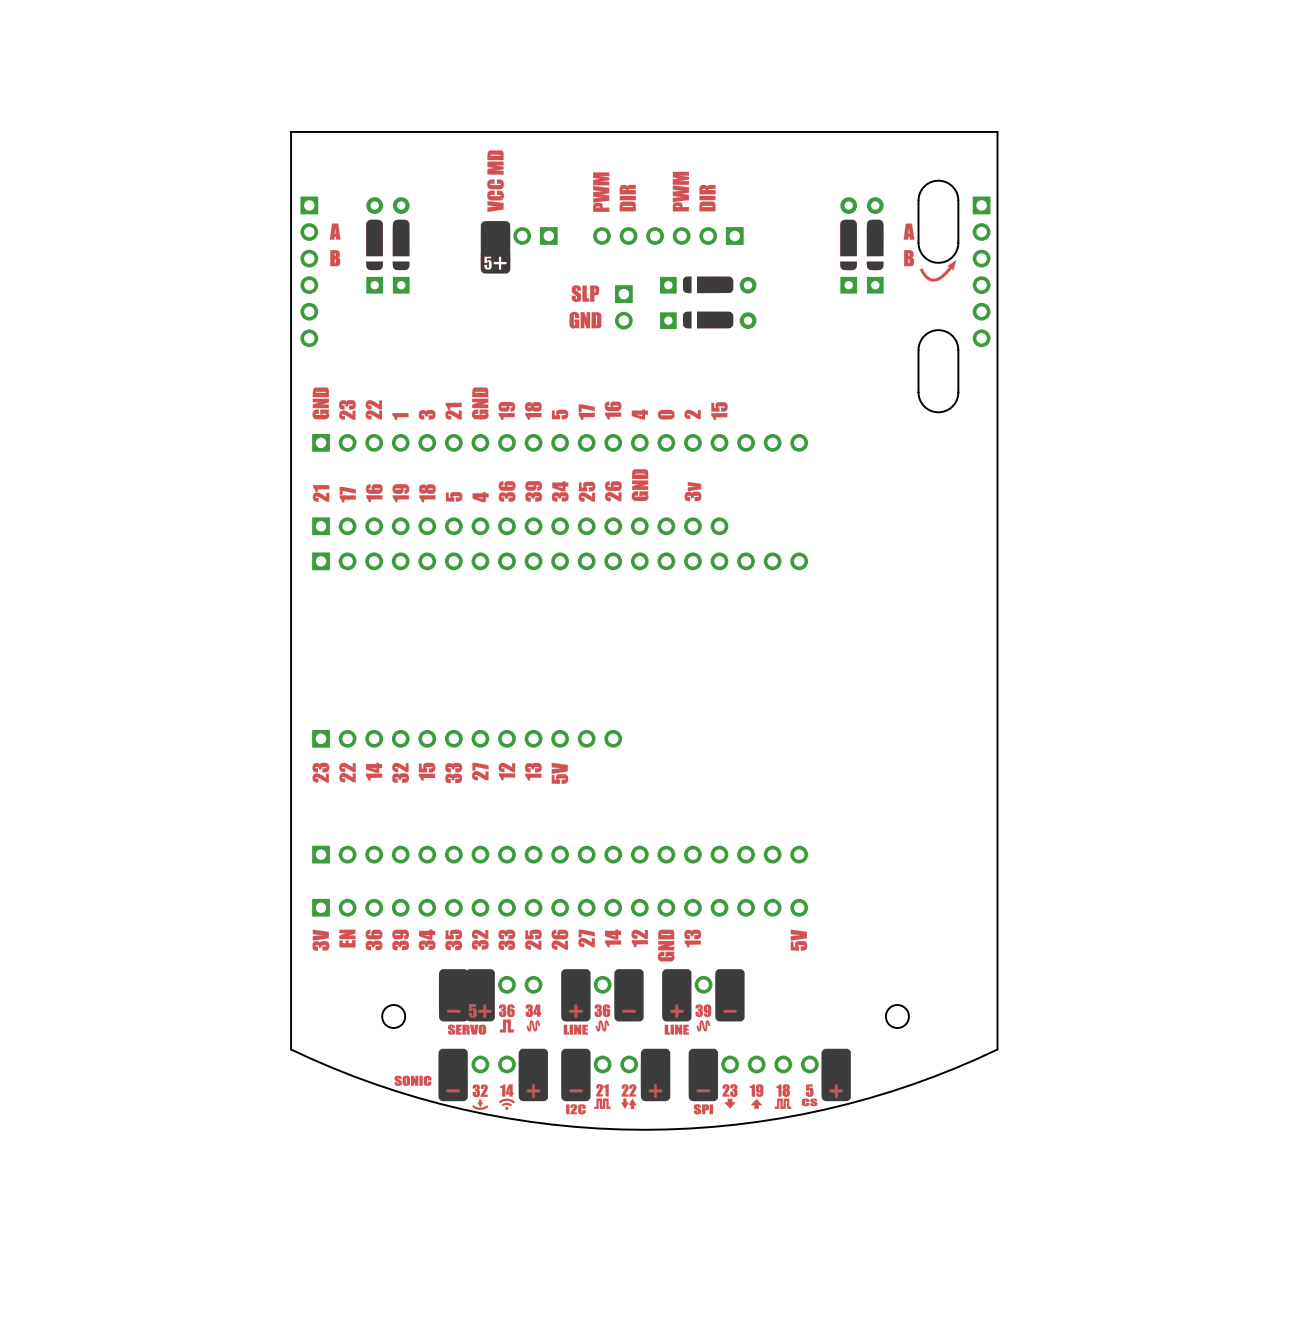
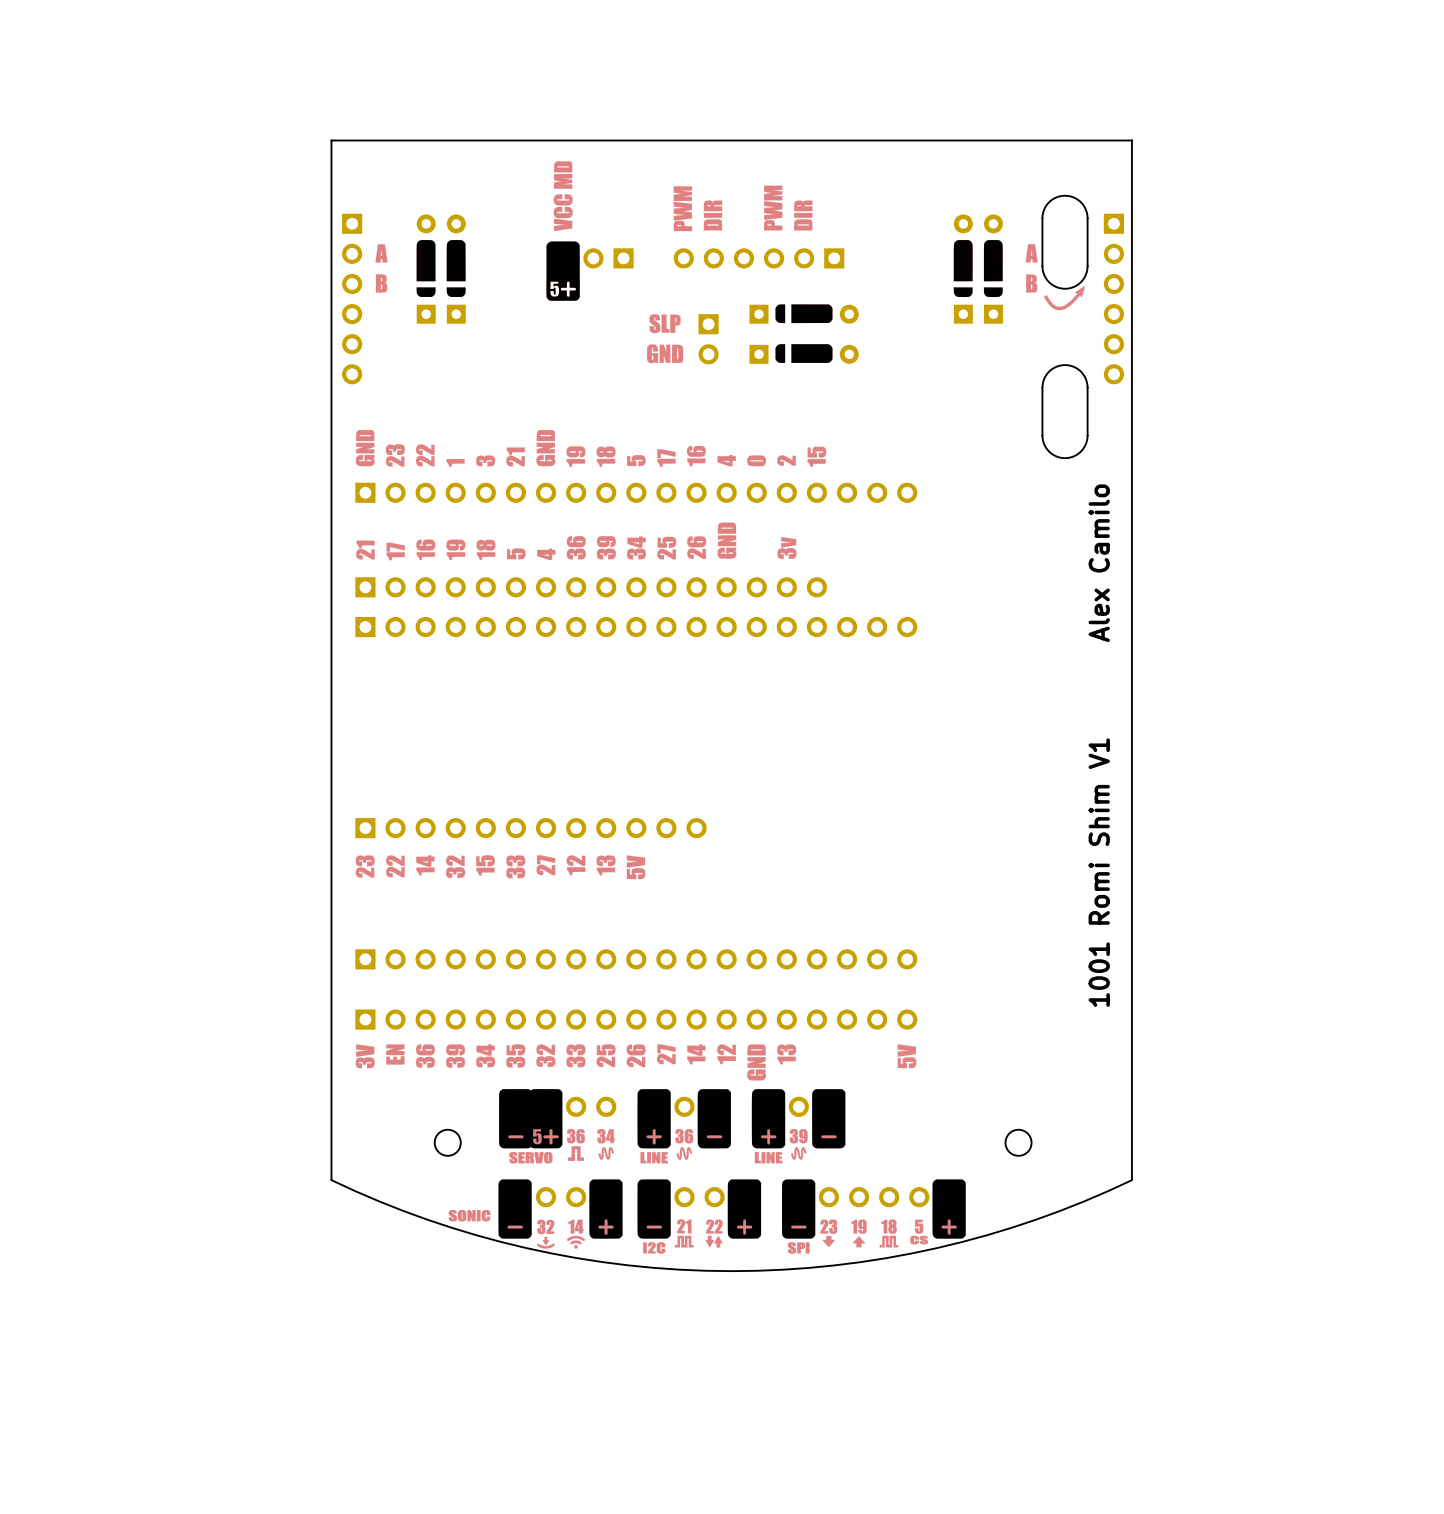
text: none -> 1001 Romi Shim V1 Alex Camilo (1099, 745)

